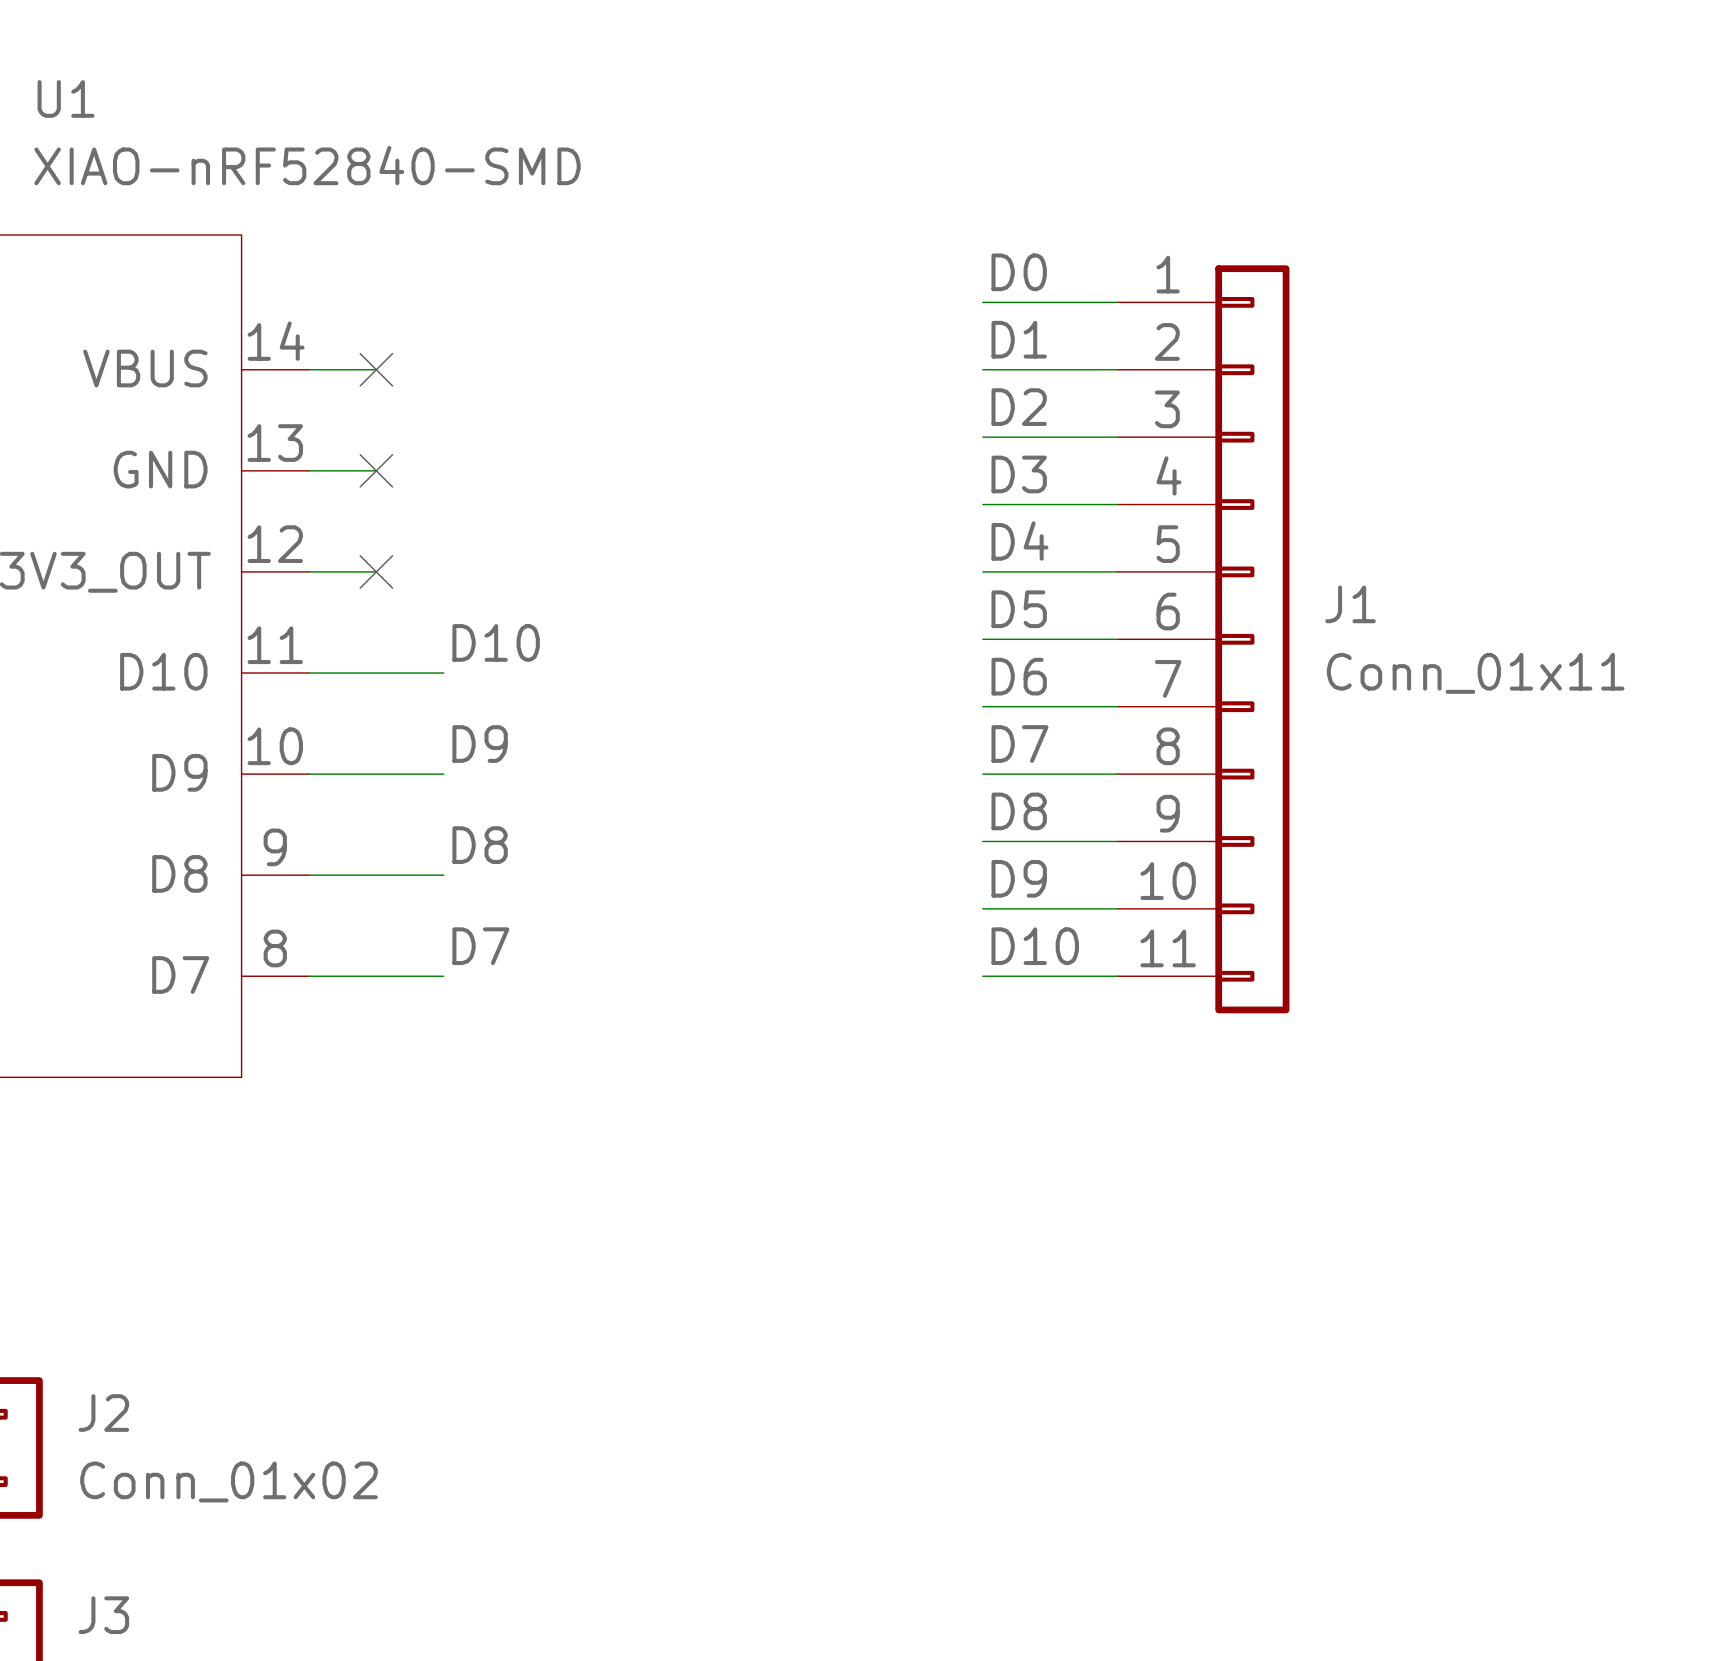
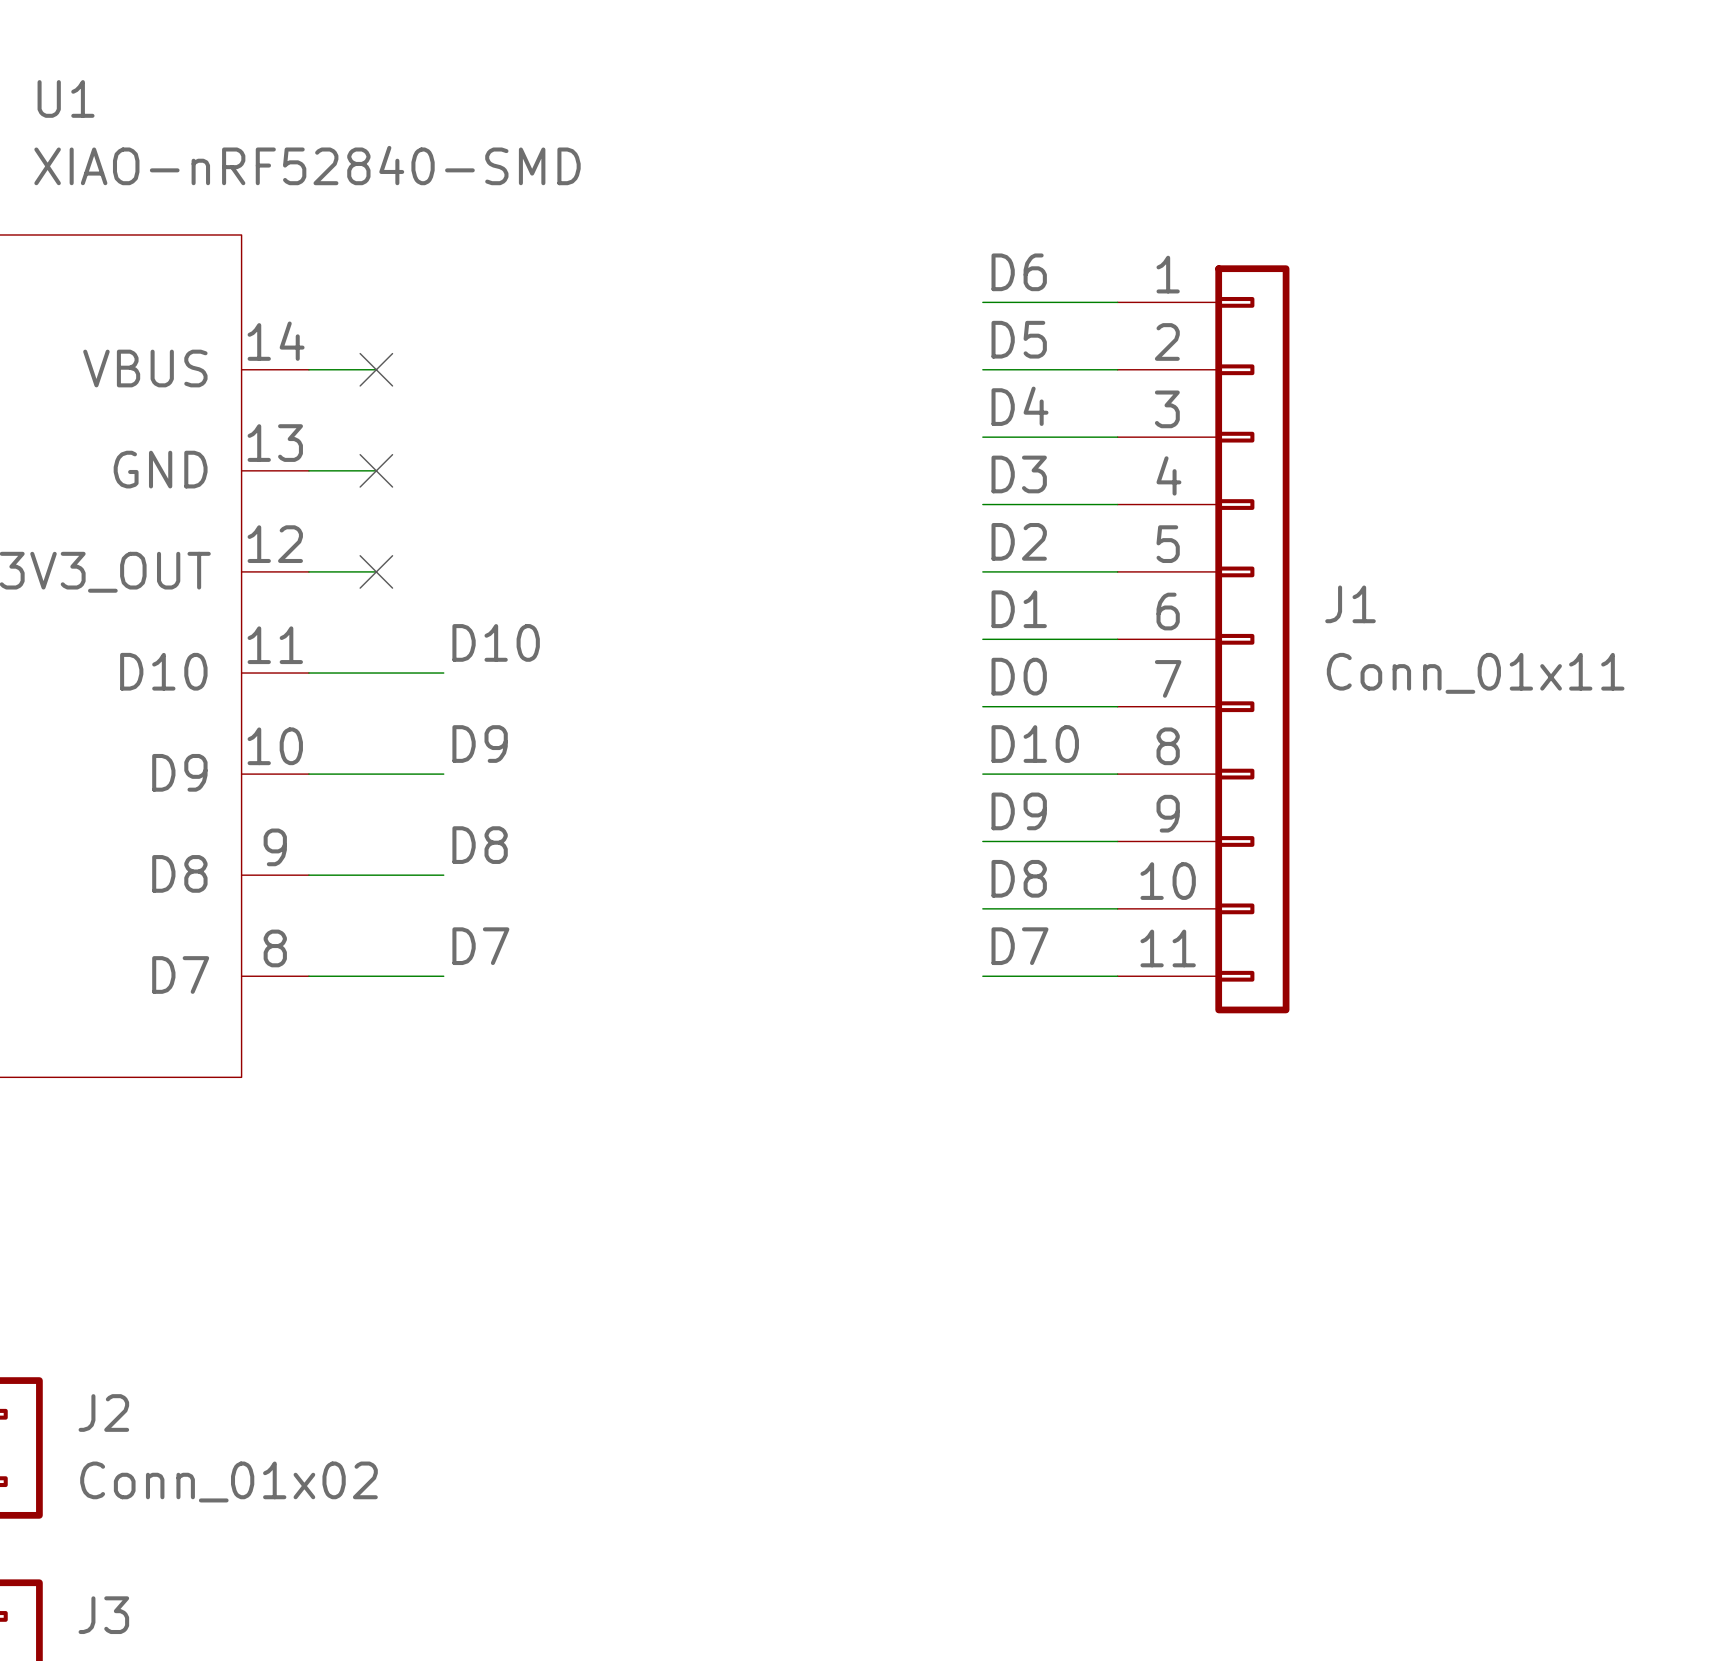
label: D0 (1019, 272) -> D6 (1019, 272)
label: D1 (1019, 339) -> D5 (1019, 339)
label: D2 (1019, 407) -> D4 (1019, 406)
label: D4 (1019, 541) -> D2 (1019, 541)
label: D5 (1019, 609) -> D1 (1019, 609)
label: D6 (1019, 676) -> D0 (1019, 676)
label: D7 (1019, 744) -> D10 (1035, 744)
label: D8 (1019, 811) -> D9 (1019, 811)
label: D9 (1019, 878) -> D8 (1019, 878)
label: D10 (1035, 946) -> D7 (1019, 946)

